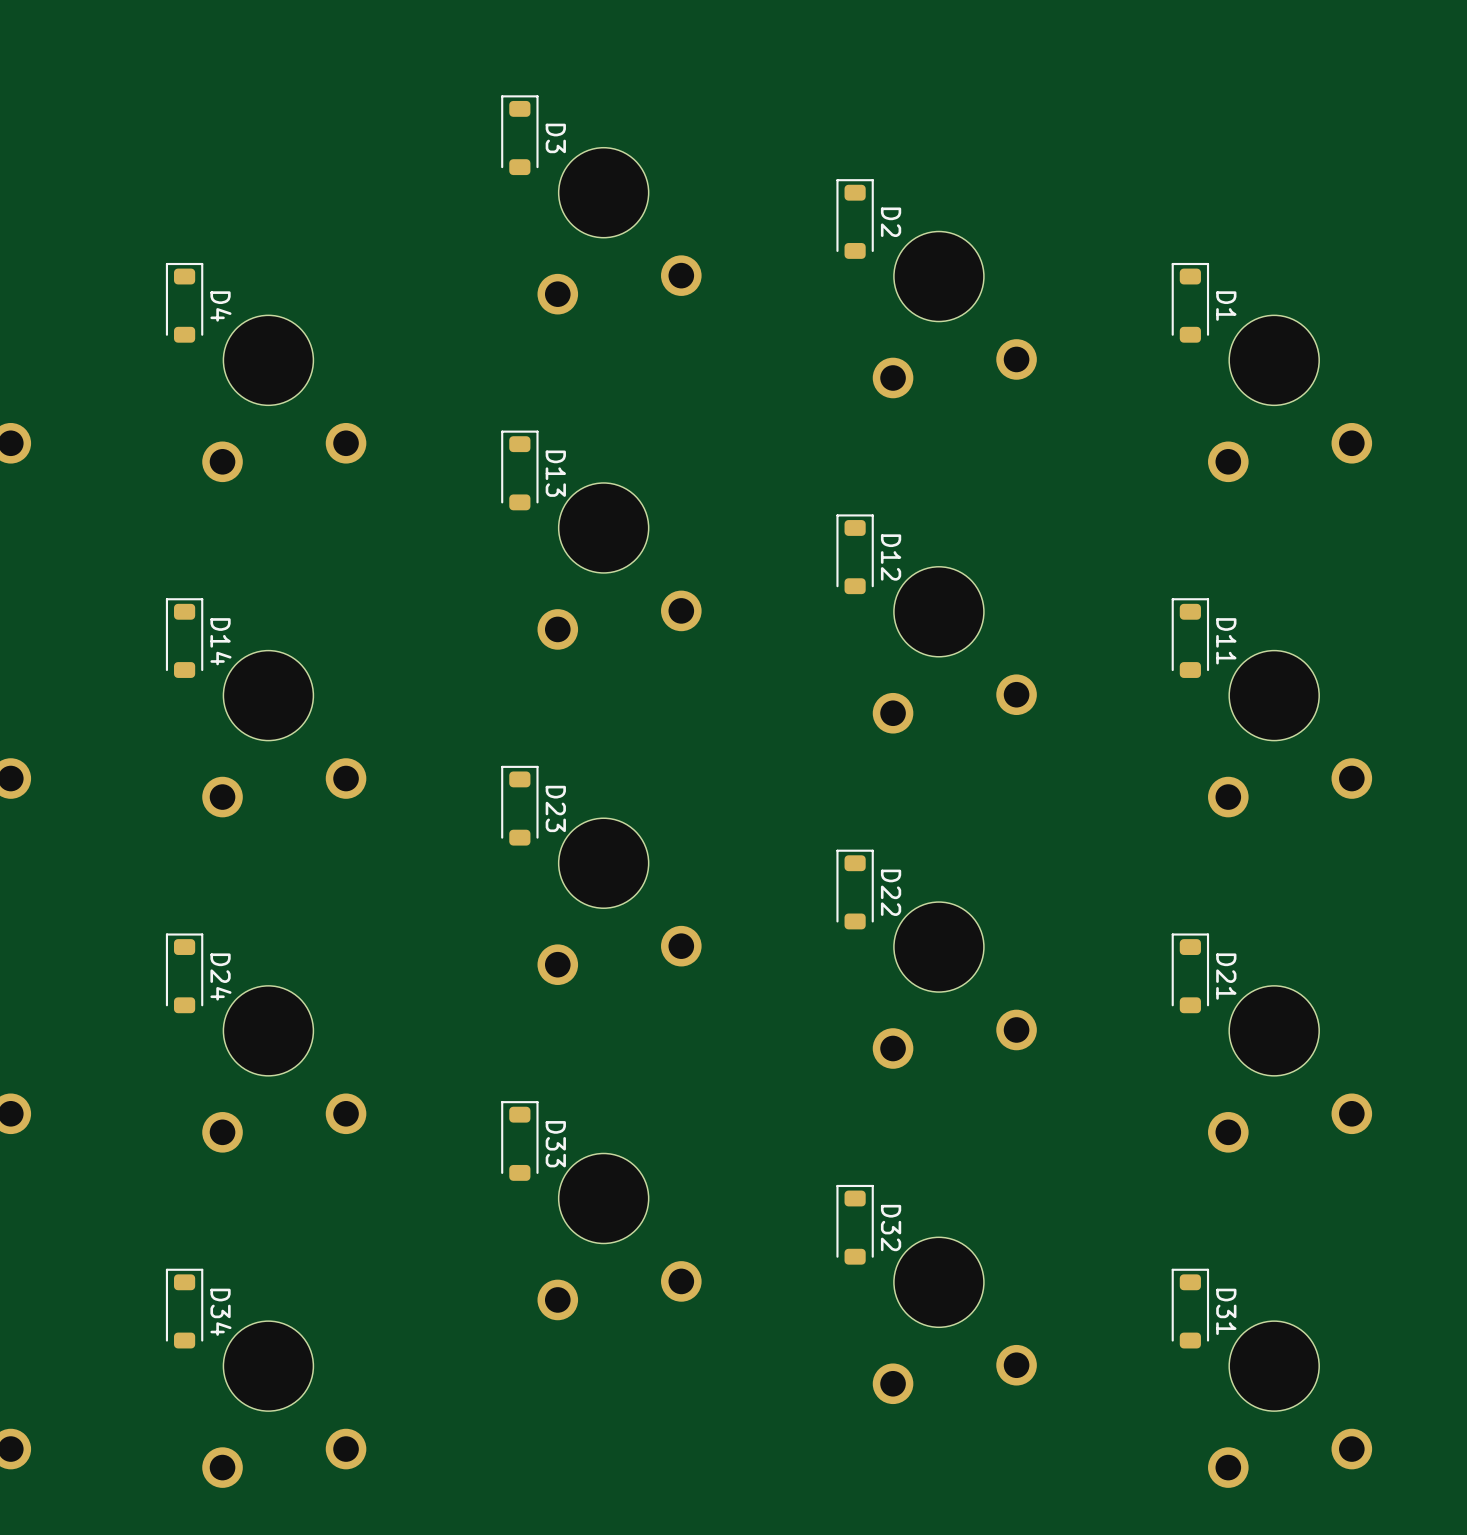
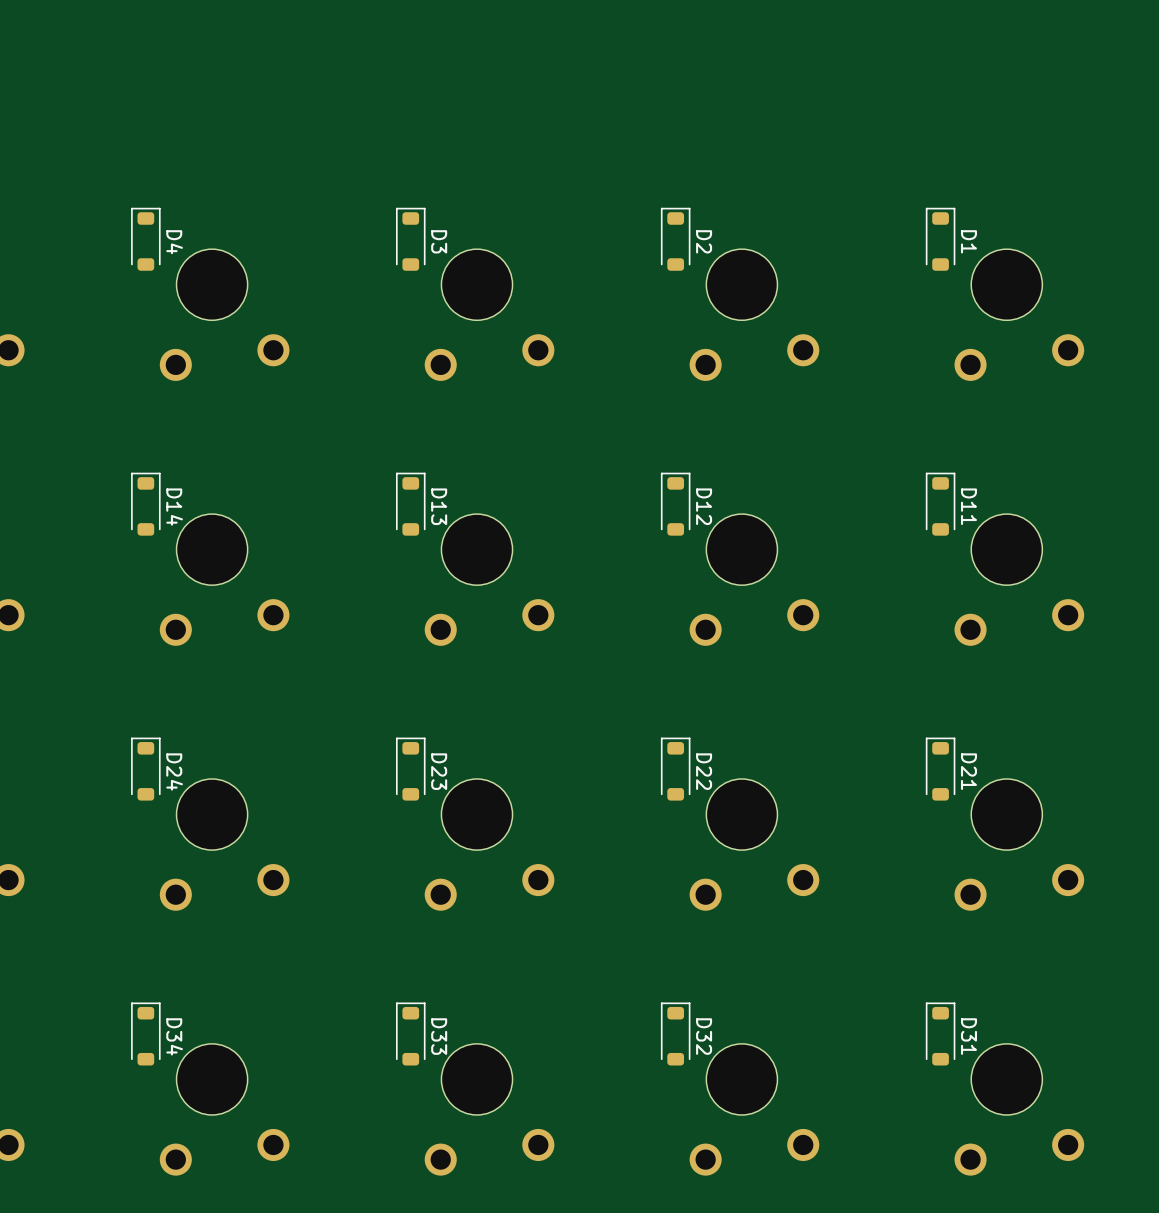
D3 position: (519, 135) -> (410, 239)
D2 position: (855, 219) -> (675, 239)
part: (619, 231) -> none
part position: (954, 314) -> (754, 315)
part: none -> (489, 315)
D13 position: (519, 470) -> (410, 504)
D12 position: (855, 554) -> (675, 504)
part: (619, 566) -> none
part position: (954, 650) -> (754, 579)
part: none -> (489, 579)
D23 position: (519, 805) -> (410, 769)
D22 position: (855, 889) -> (675, 769)
part: (619, 901) -> none
part position: (954, 985) -> (754, 844)
part: none -> (489, 844)
D33 position: (519, 1140) -> (410, 1033)
D32 position: (855, 1224) -> (675, 1033)
part: (619, 1236) -> none
part position: (954, 1320) -> (754, 1109)
part: none -> (489, 1109)

